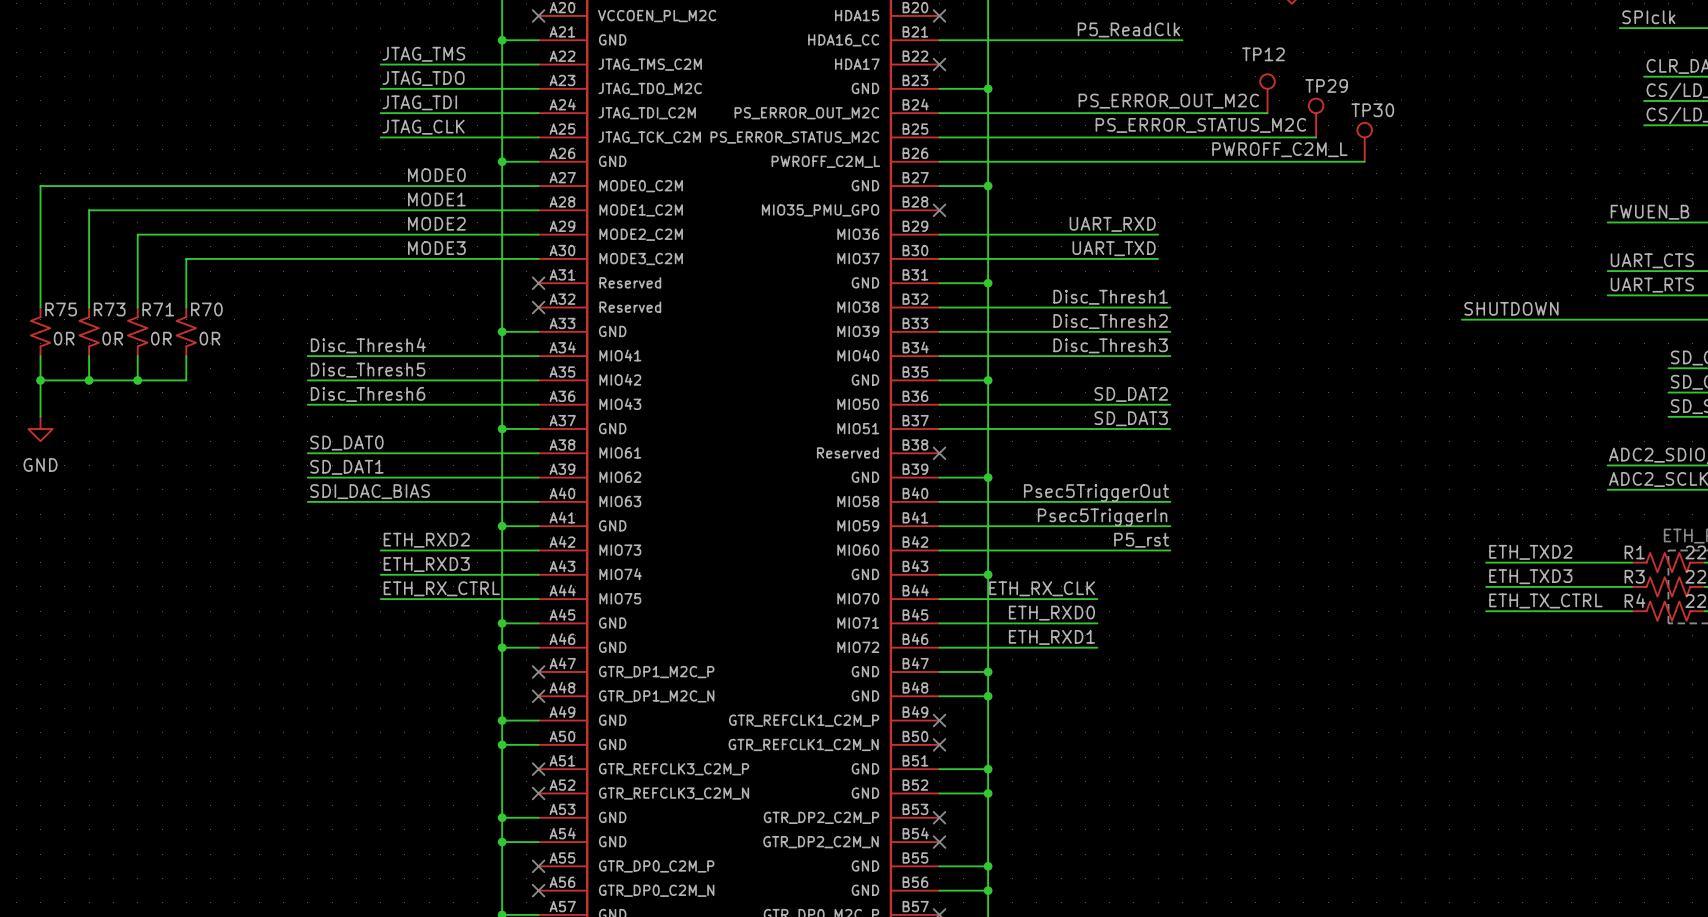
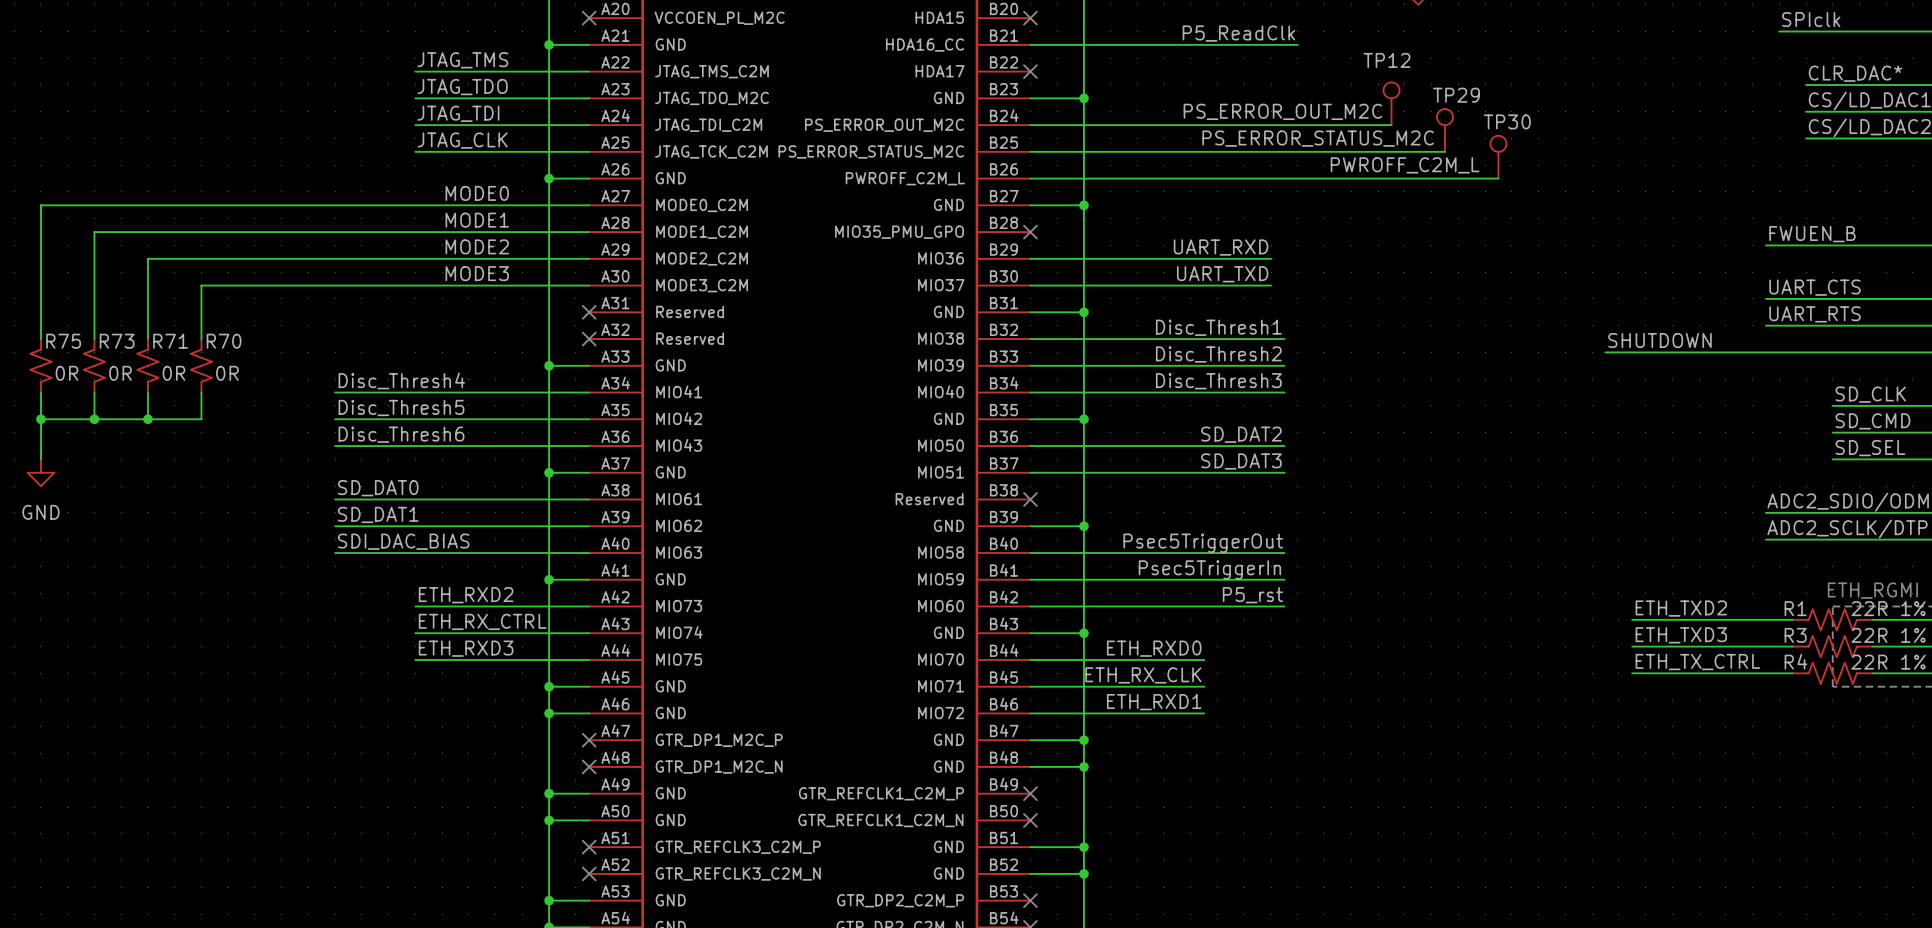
label: ETH_RXD3 (426, 564) -> ETH_RX_CTRL (482, 621)
label: ETH_RX_CTRL (441, 588) -> ETH_RXD3 (466, 648)
label: ETH_RX_CLK (1042, 588) -> ETH_RXD0 (1154, 648)
label: ETH_RXD0 (1051, 613) -> ETH_RX_CLK (1143, 675)

